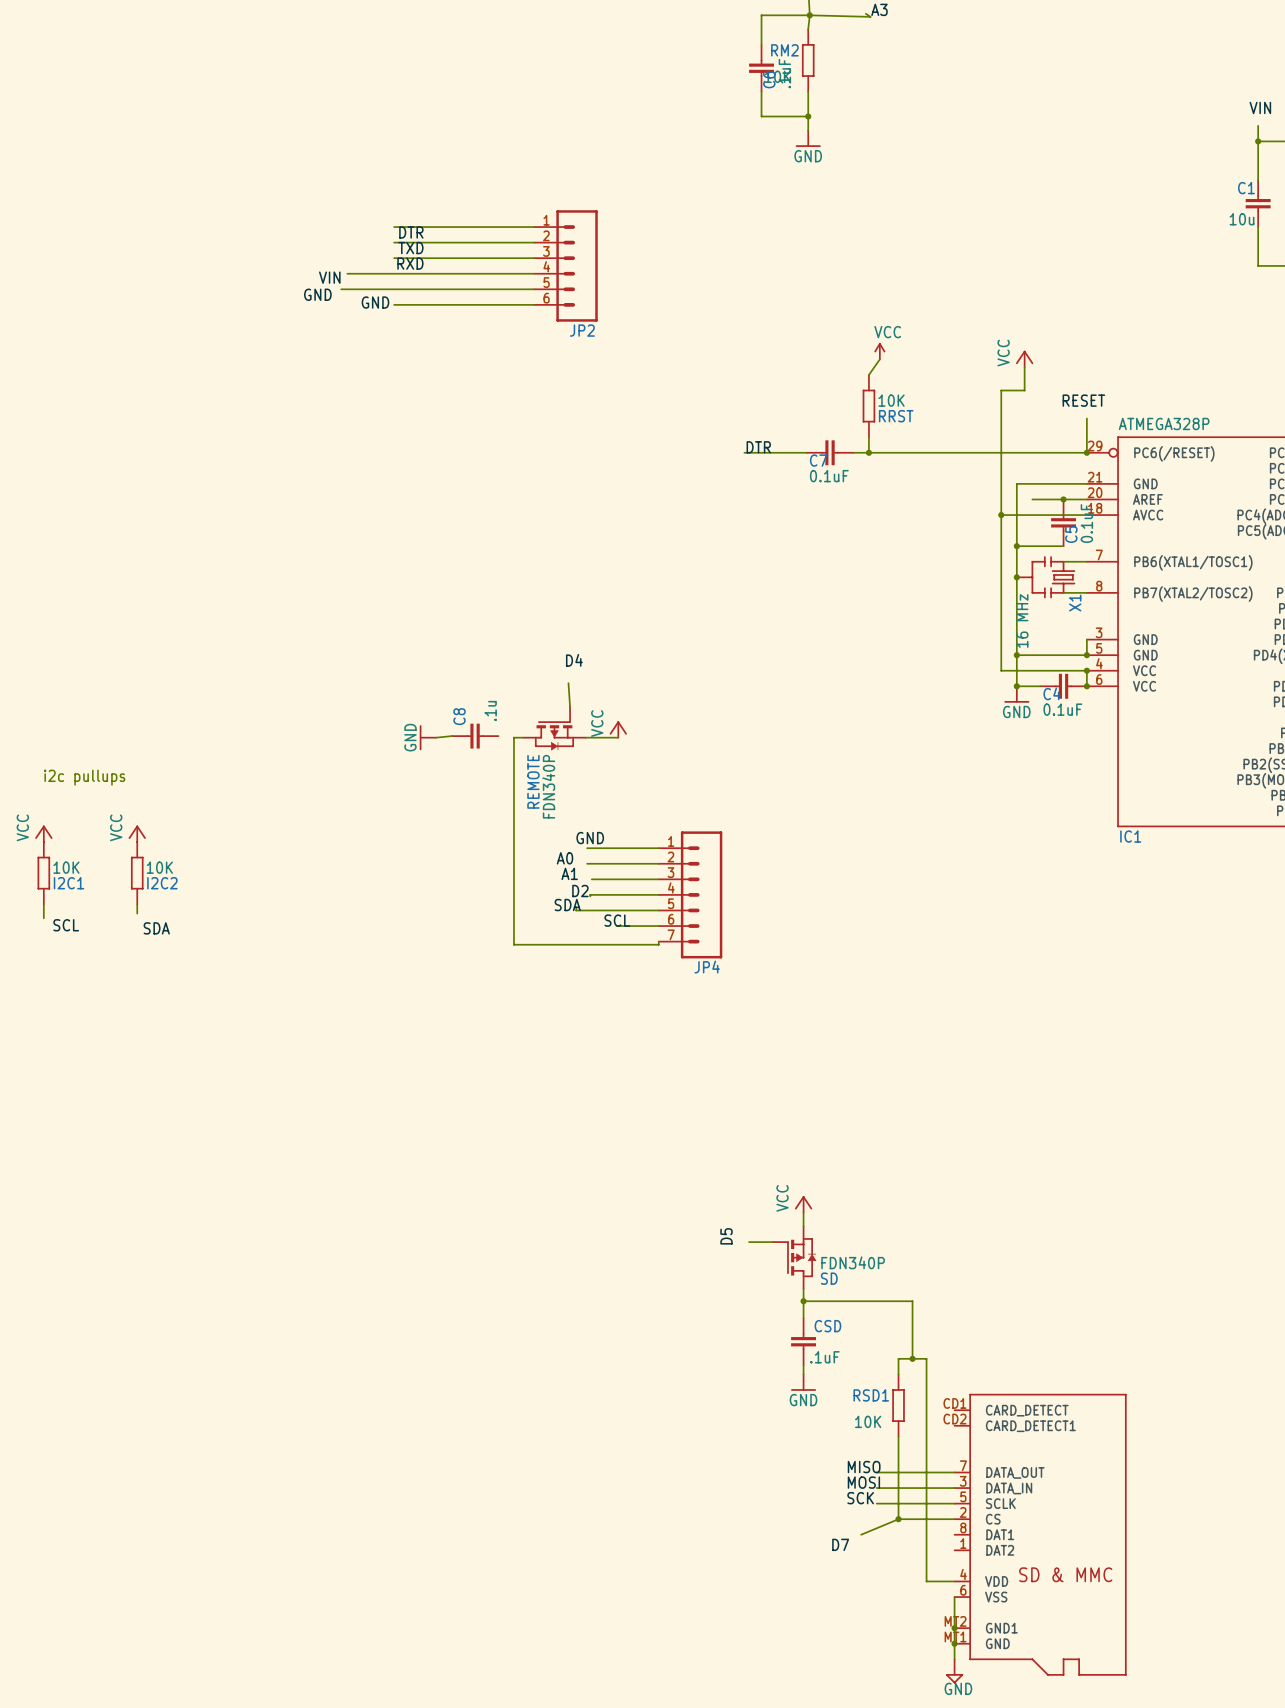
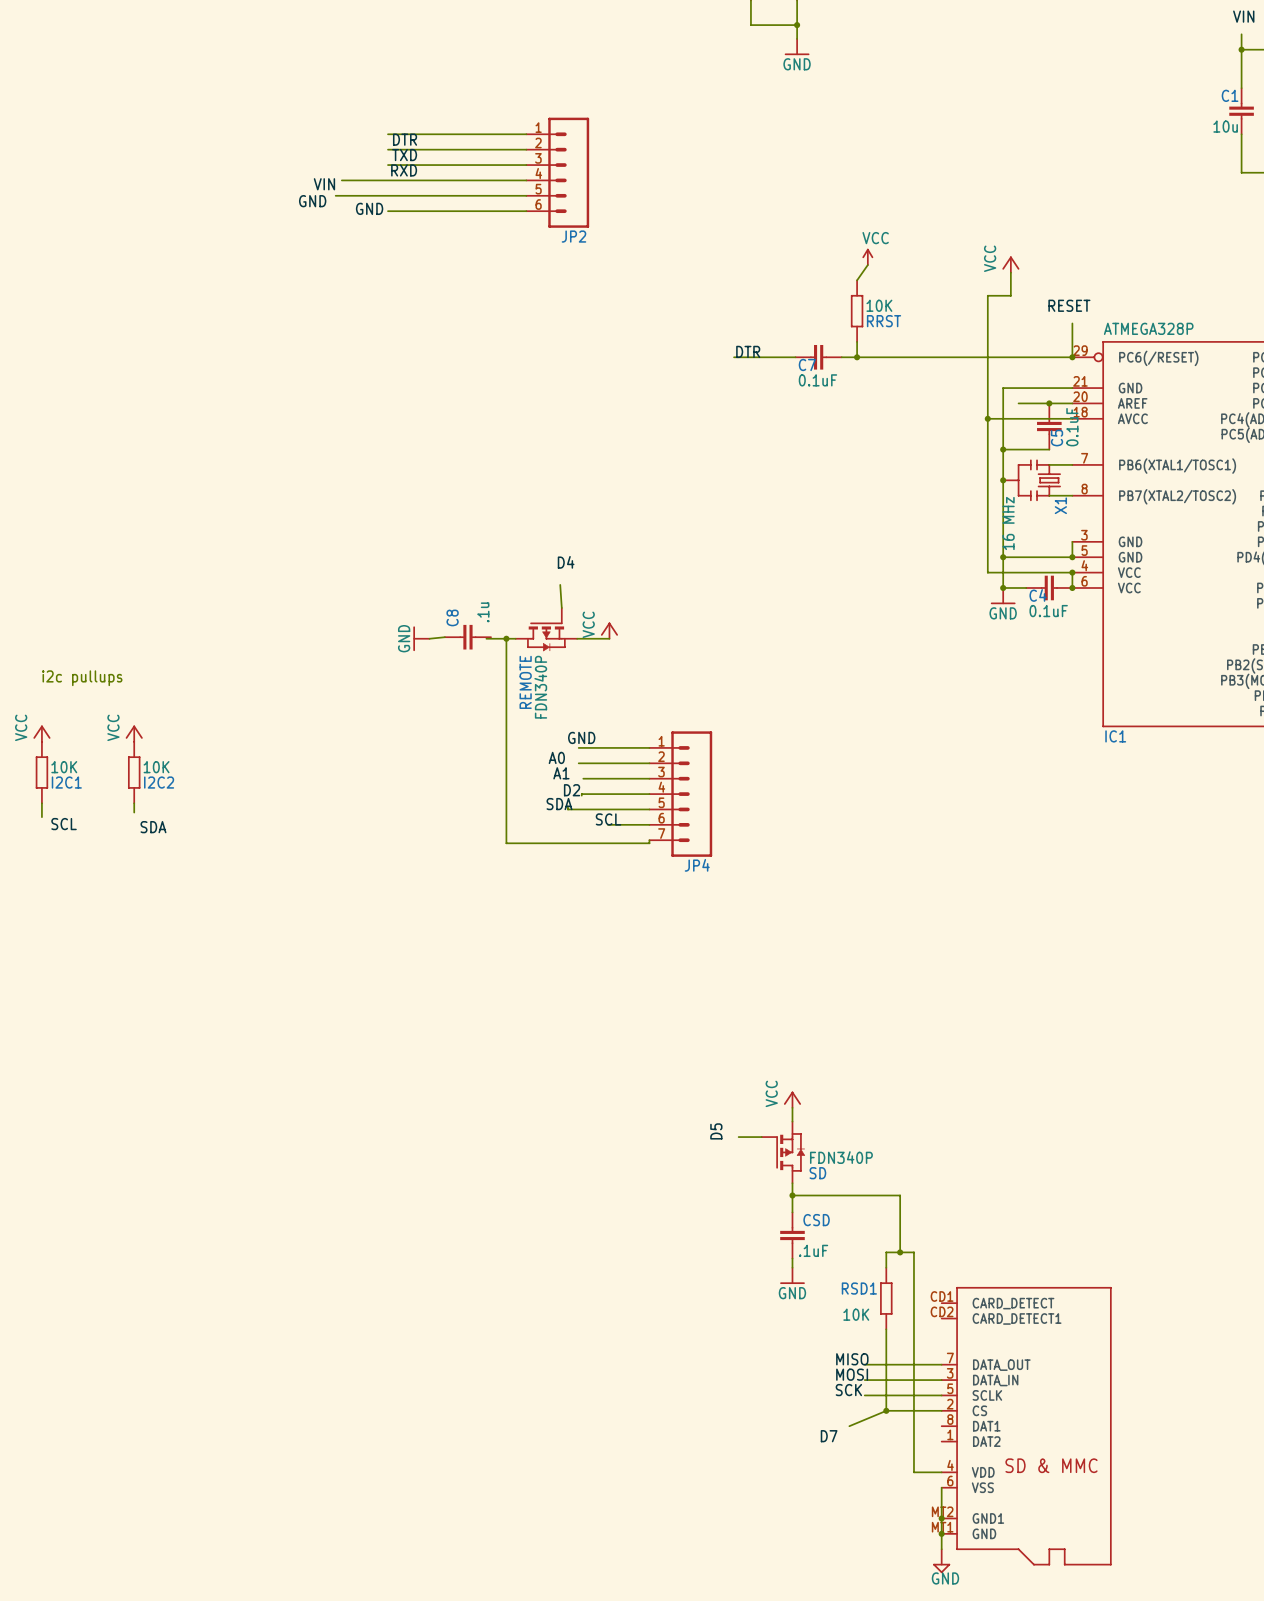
wire: none -> (486, 638) (506, 638)
junction: none -> (506, 638)

